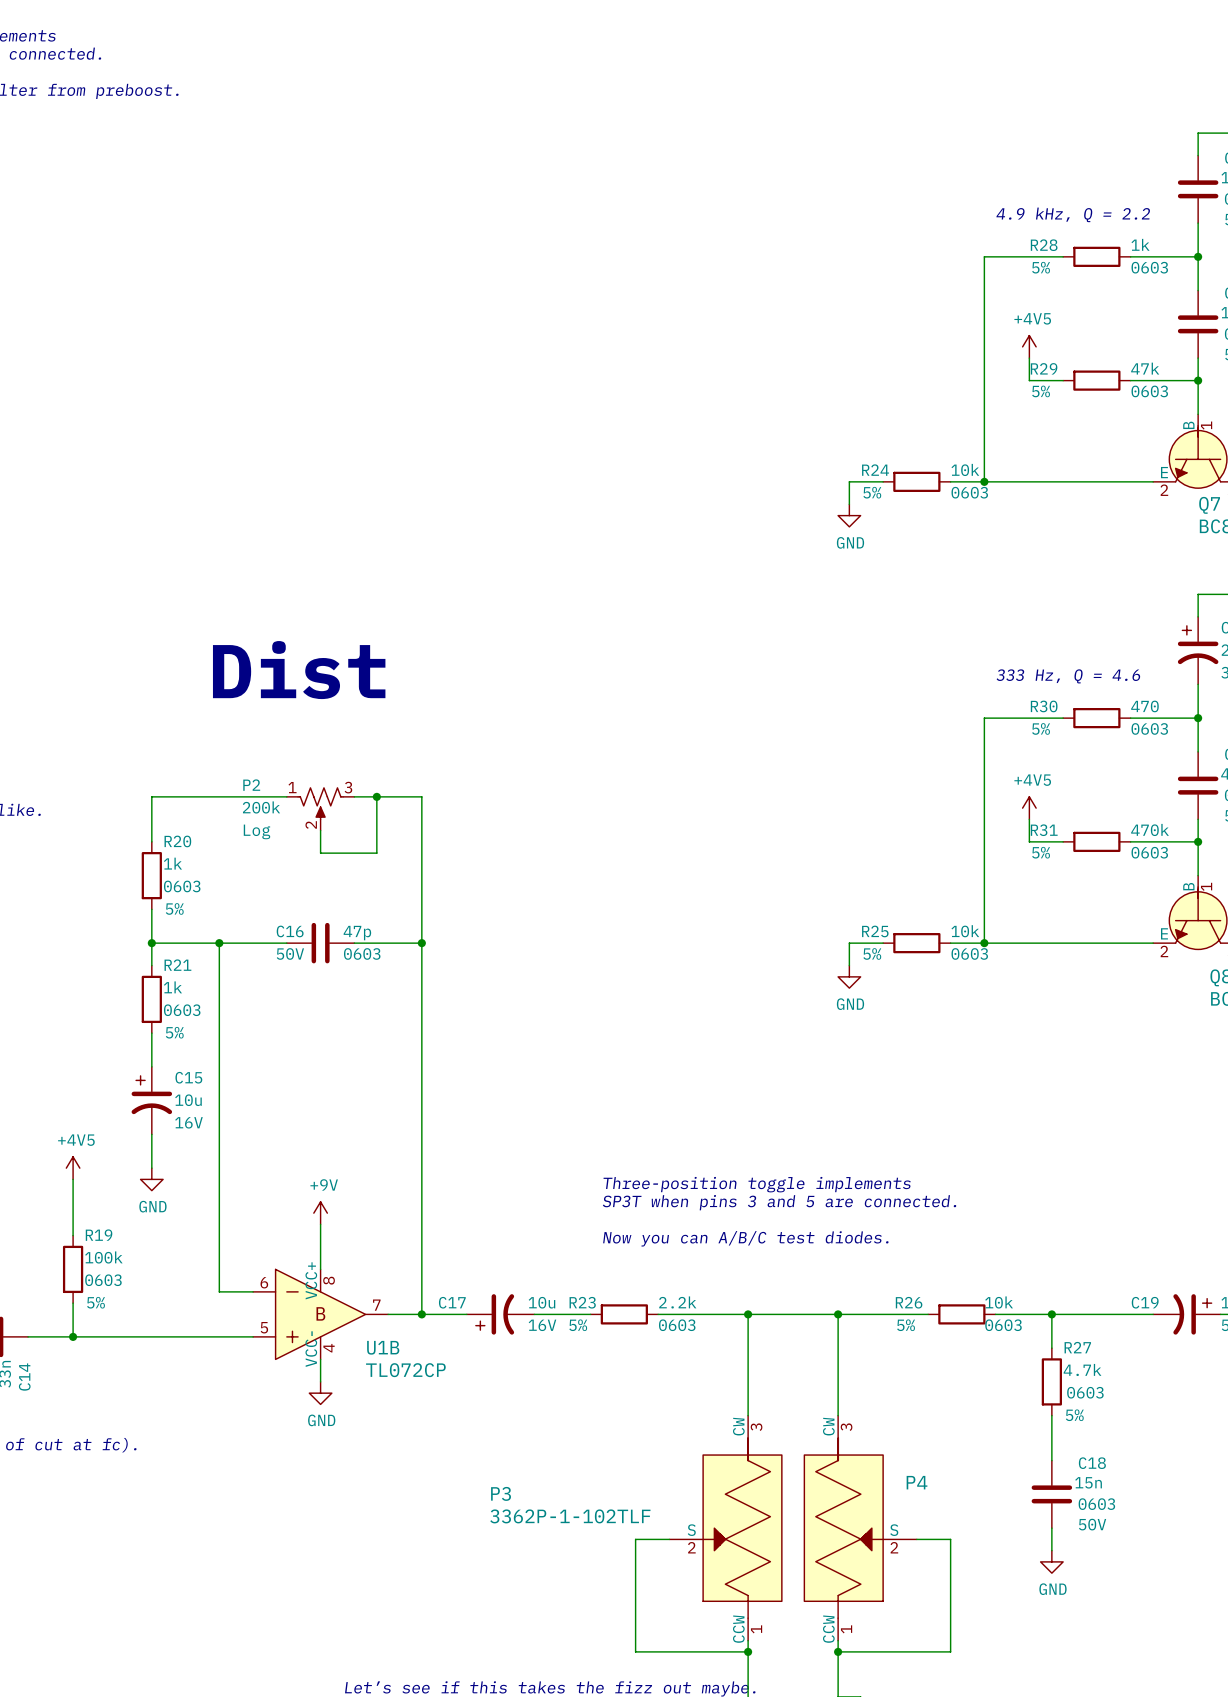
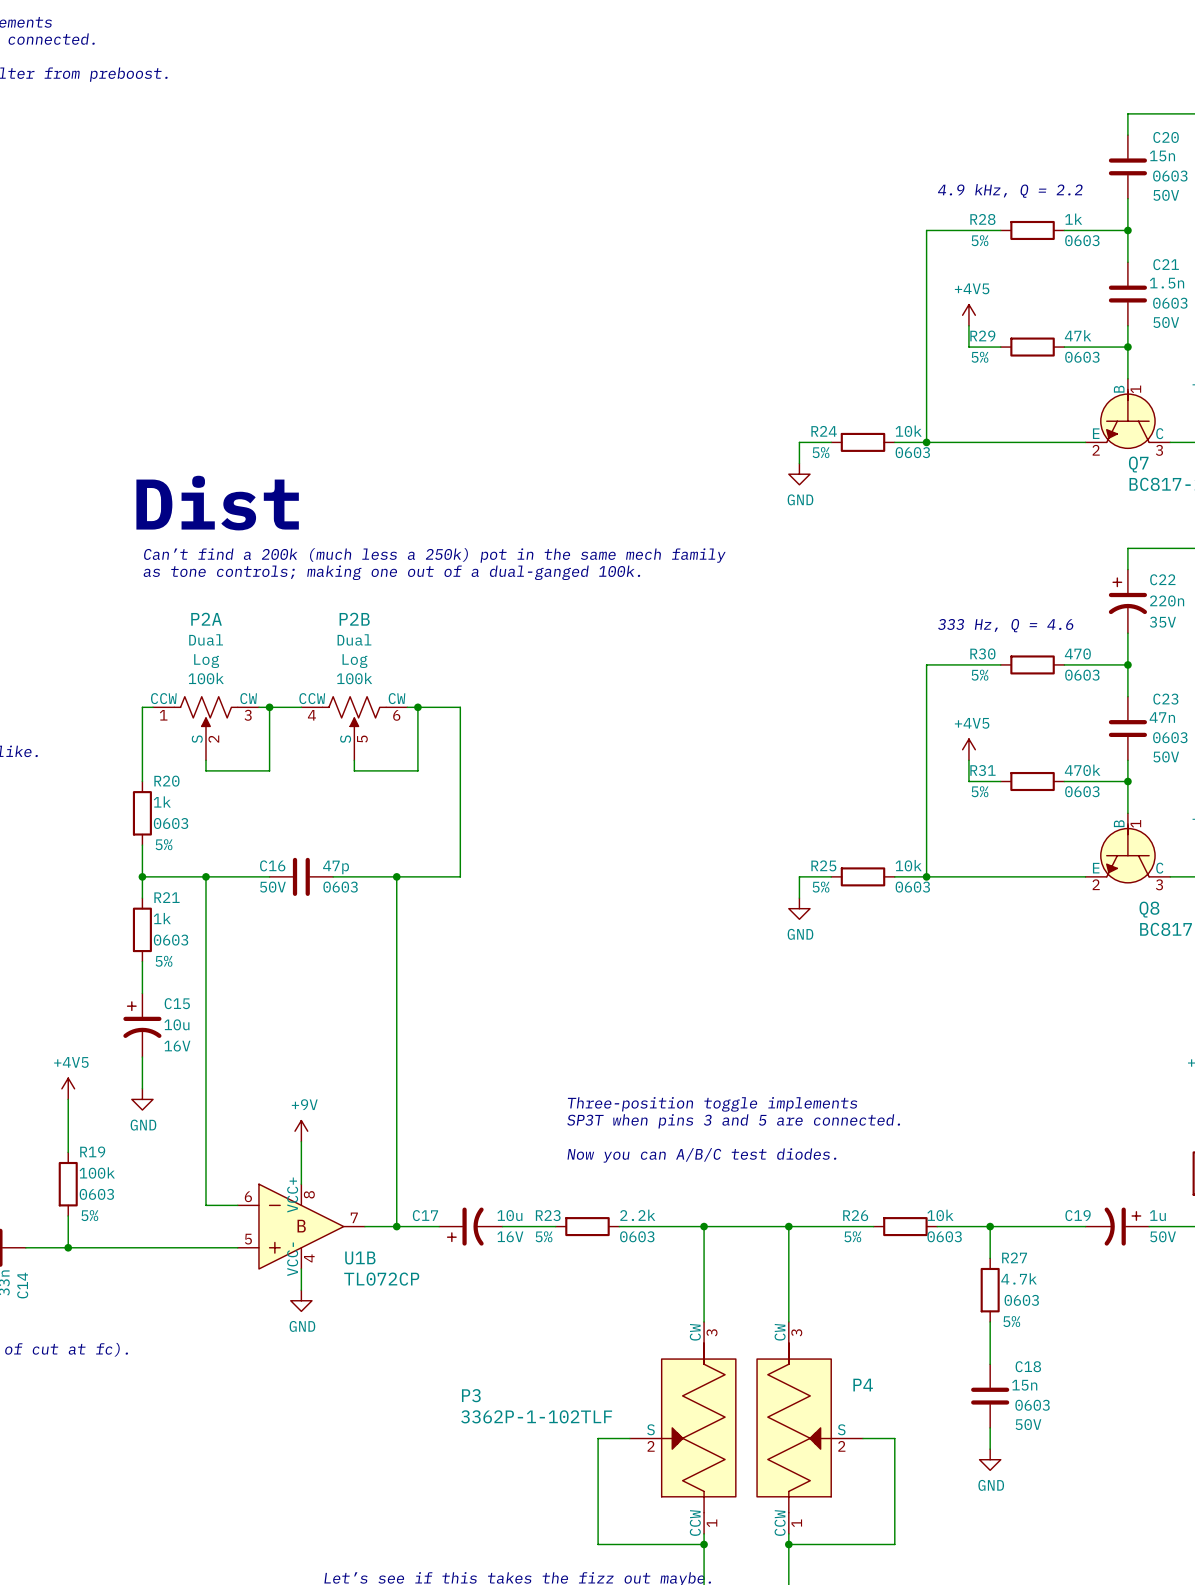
text: none -> Can’t find a 200k (much less a 250k) pot in the same mech family (434, 555)
text: none -> as tone controls; making one out of a dual-ganged 100k. (391, 572)
text position: Dist (299, 670) -> Dist (217, 503)
wire: none -> (258, 707) (301, 707)
wire: none -> (269, 707) (269, 770) (206, 770) (206, 760)
junction: none -> (269, 707)
junction: none -> (417, 707)
P2A: none -> (206, 728)
P2B: none -> (354, 728)
wire: (151, 796) (286, 796) -> (142, 739) (142, 707) (153, 707)
wire: (354, 796) (421, 796) (421, 943) -> (407, 707) (460, 707) (460, 876) (396, 876)
junction: (376, 796) -> none
P2: (320, 809) -> none
wire: (320, 830) (320, 853) (376, 853) (376, 830) -> (417, 707) (417, 770) (354, 770)

